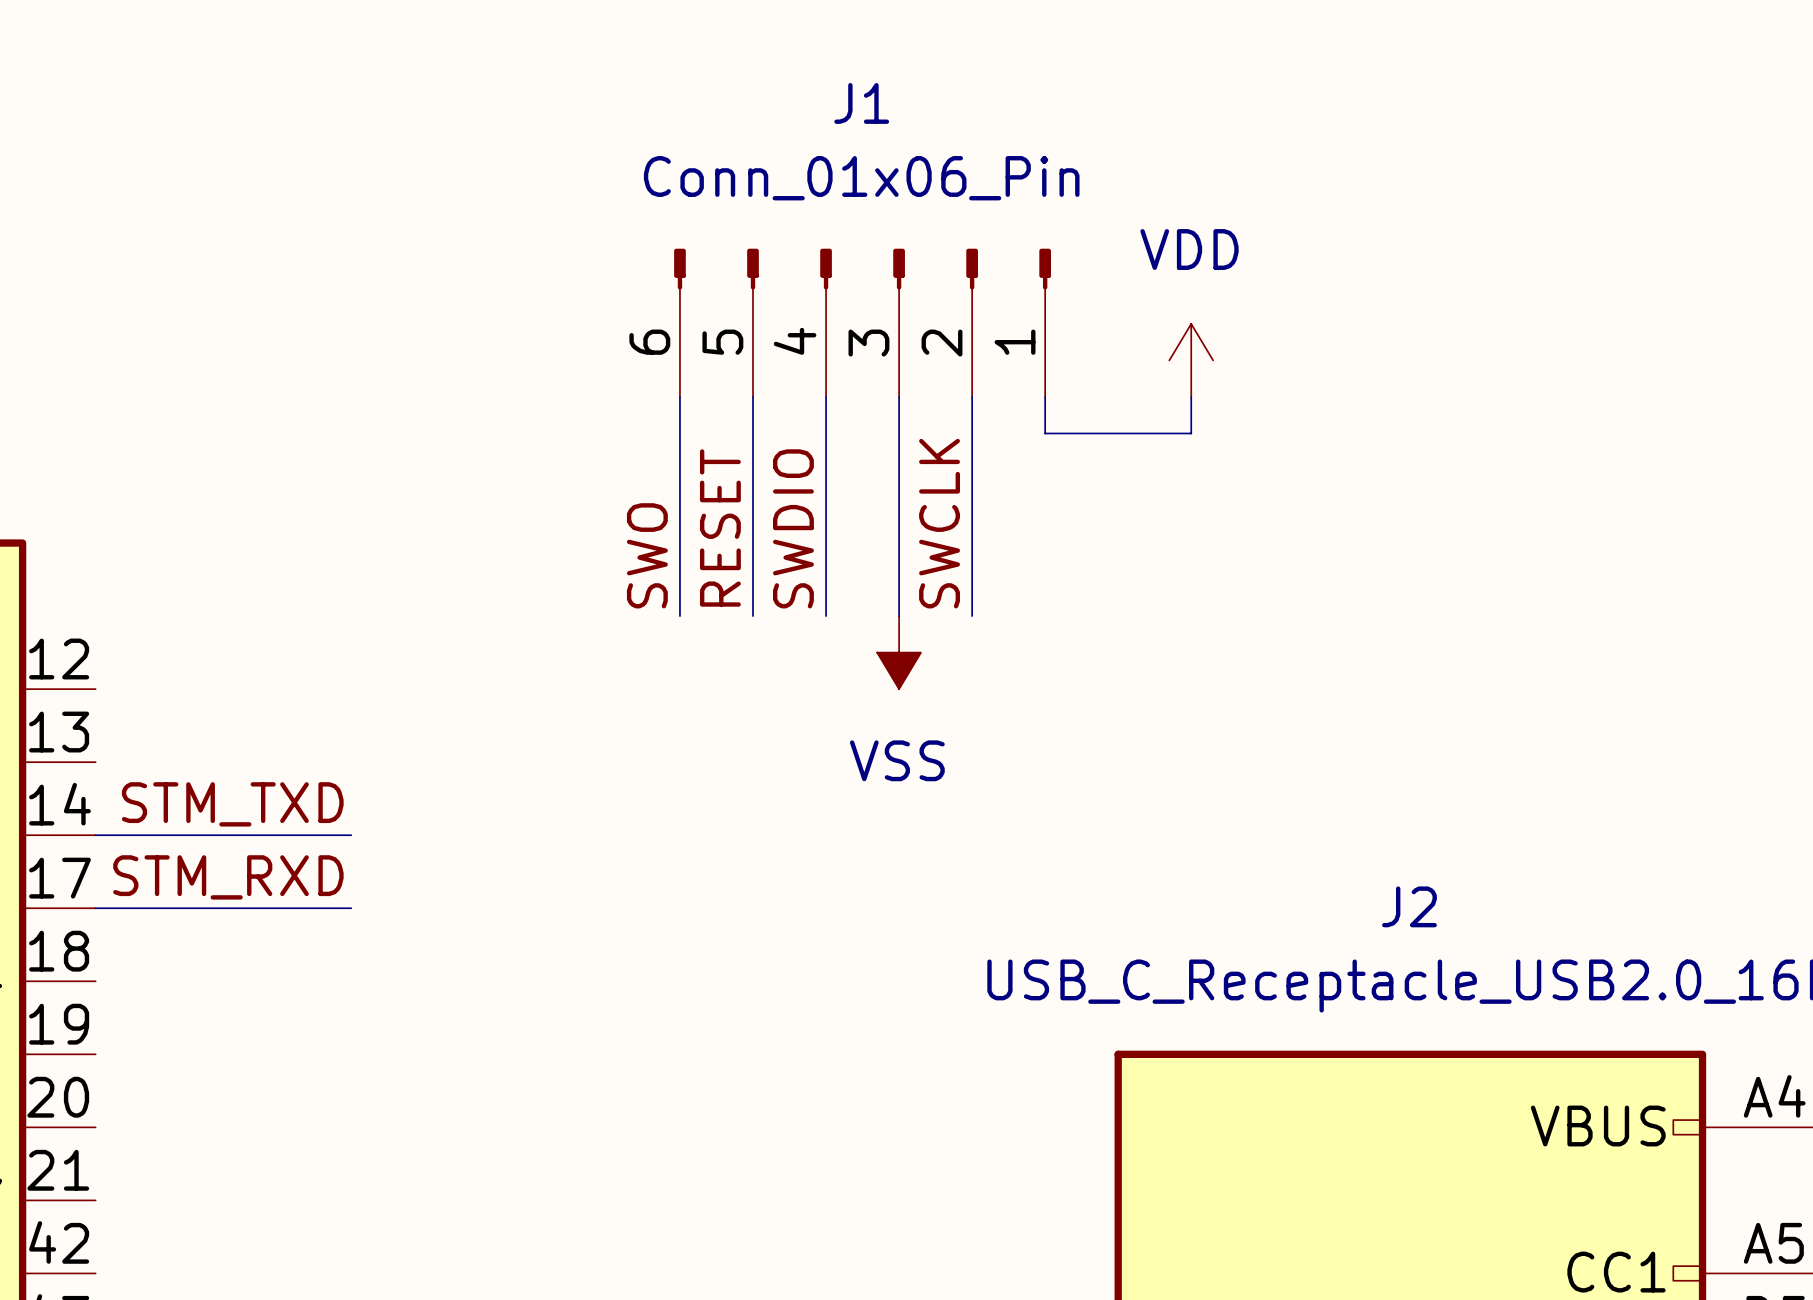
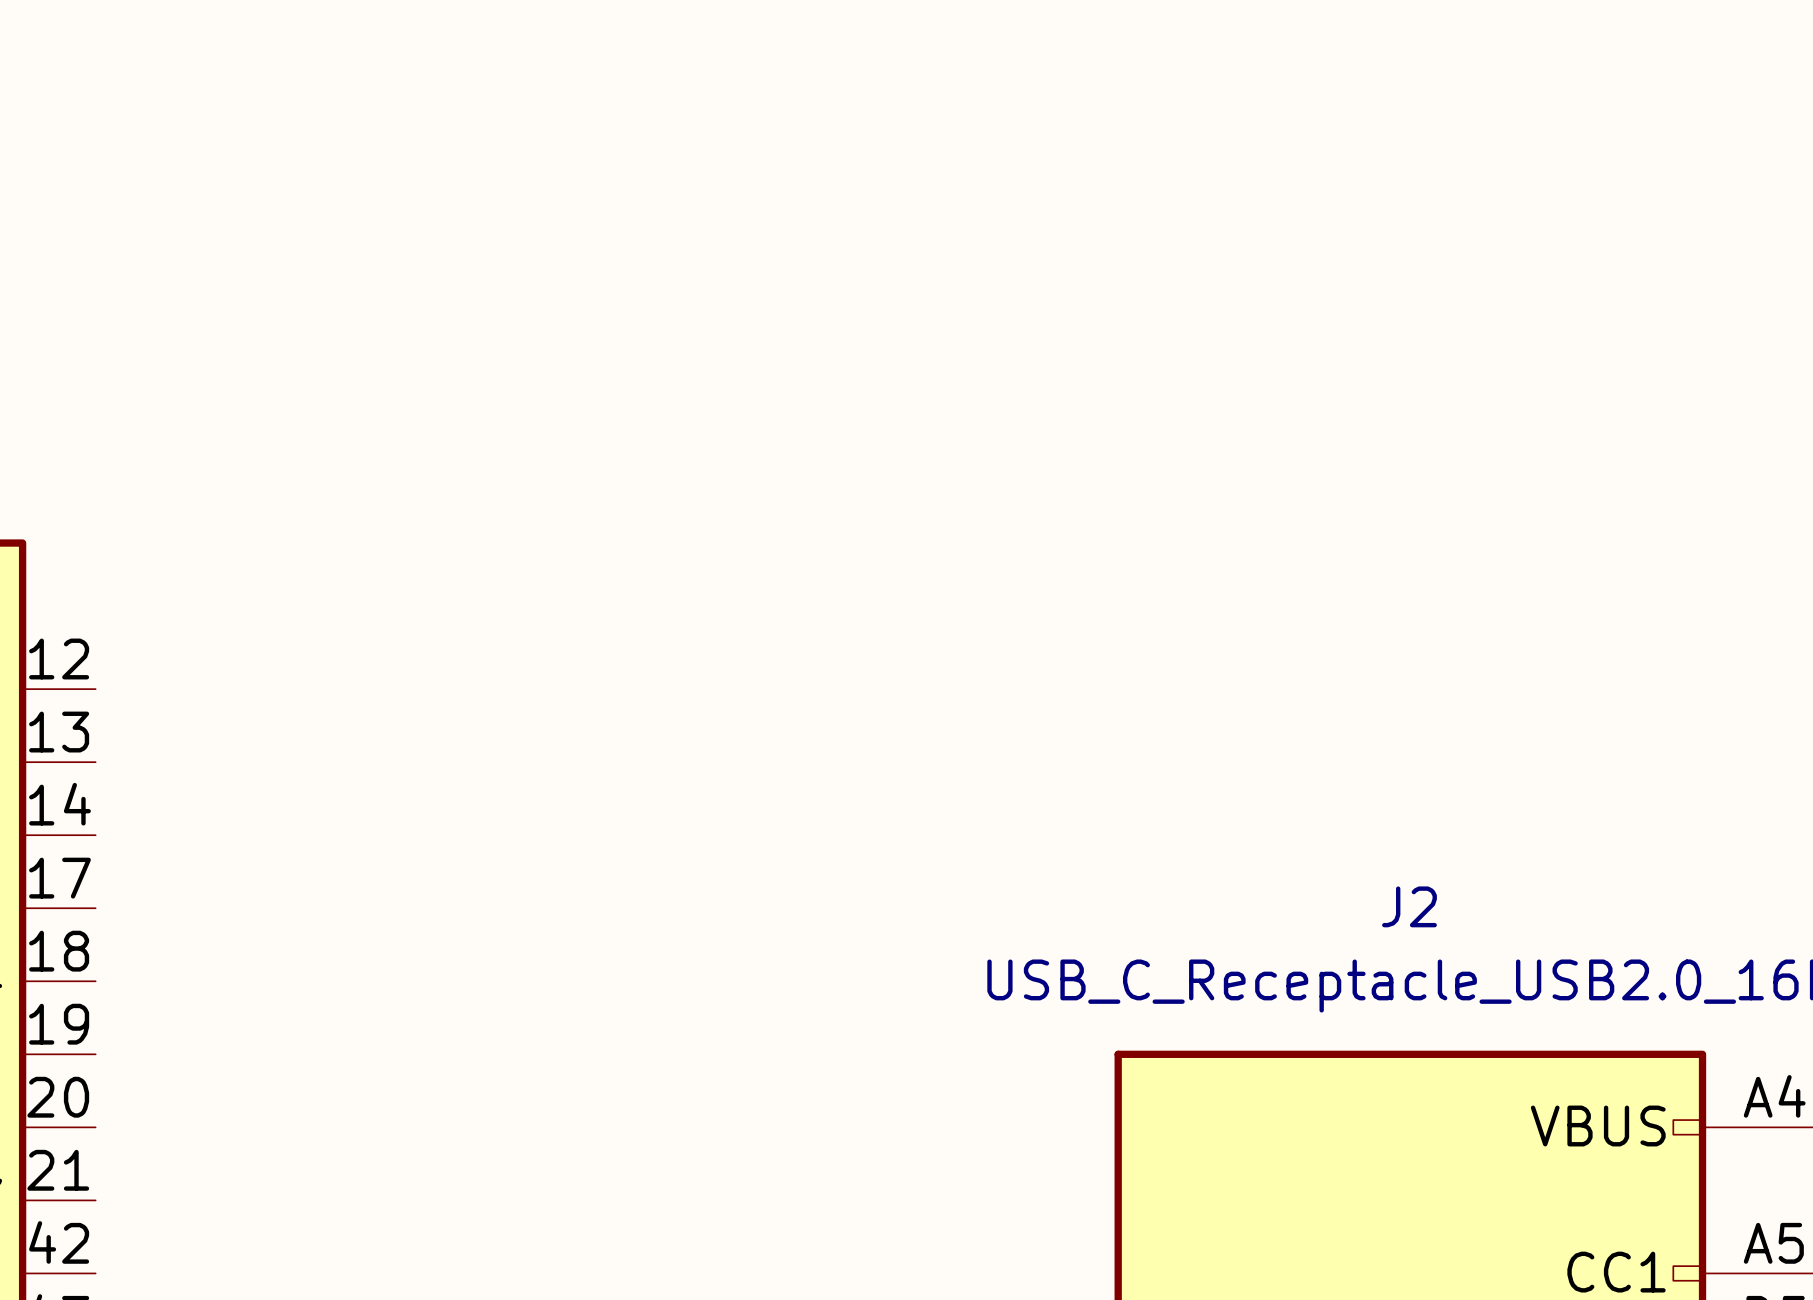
J1: Conn_01x06_Pin (862, 322) -> none
power symbol: VDD (1191, 360) -> none
wire: (679, 396) (679, 616) -> none
wire: (753, 396) (753, 616) -> none
wire: (826, 396) (826, 616) -> none
wire: (899, 396) (899, 616) -> none
wire: (972, 396) (972, 616) -> none
wire: (1045, 396) (1045, 433) (1191, 433) (1191, 396) -> none
label: SWCLK (939, 523) -> none
label: RESET (720, 527) -> none
label: SWDIO (793, 528) -> none
label: SWO (647, 555) -> none
power symbol: VSS (899, 652) -> none
label: STM_TXD (232, 804) -> none
wire: (95, 835) (351, 835) -> none
label: STM_RXD (228, 877) -> none
wire: (95, 908) (351, 908) -> none

